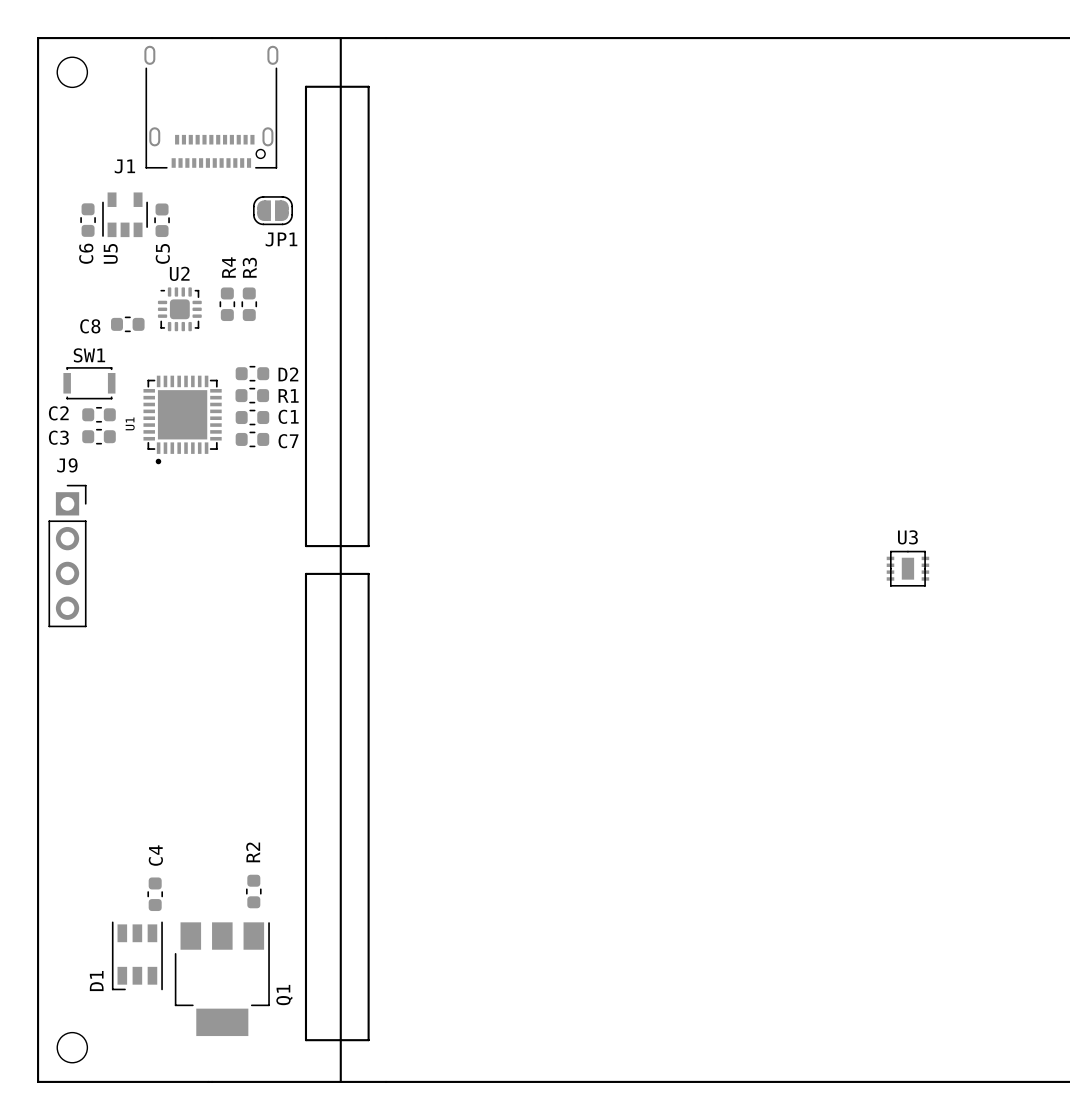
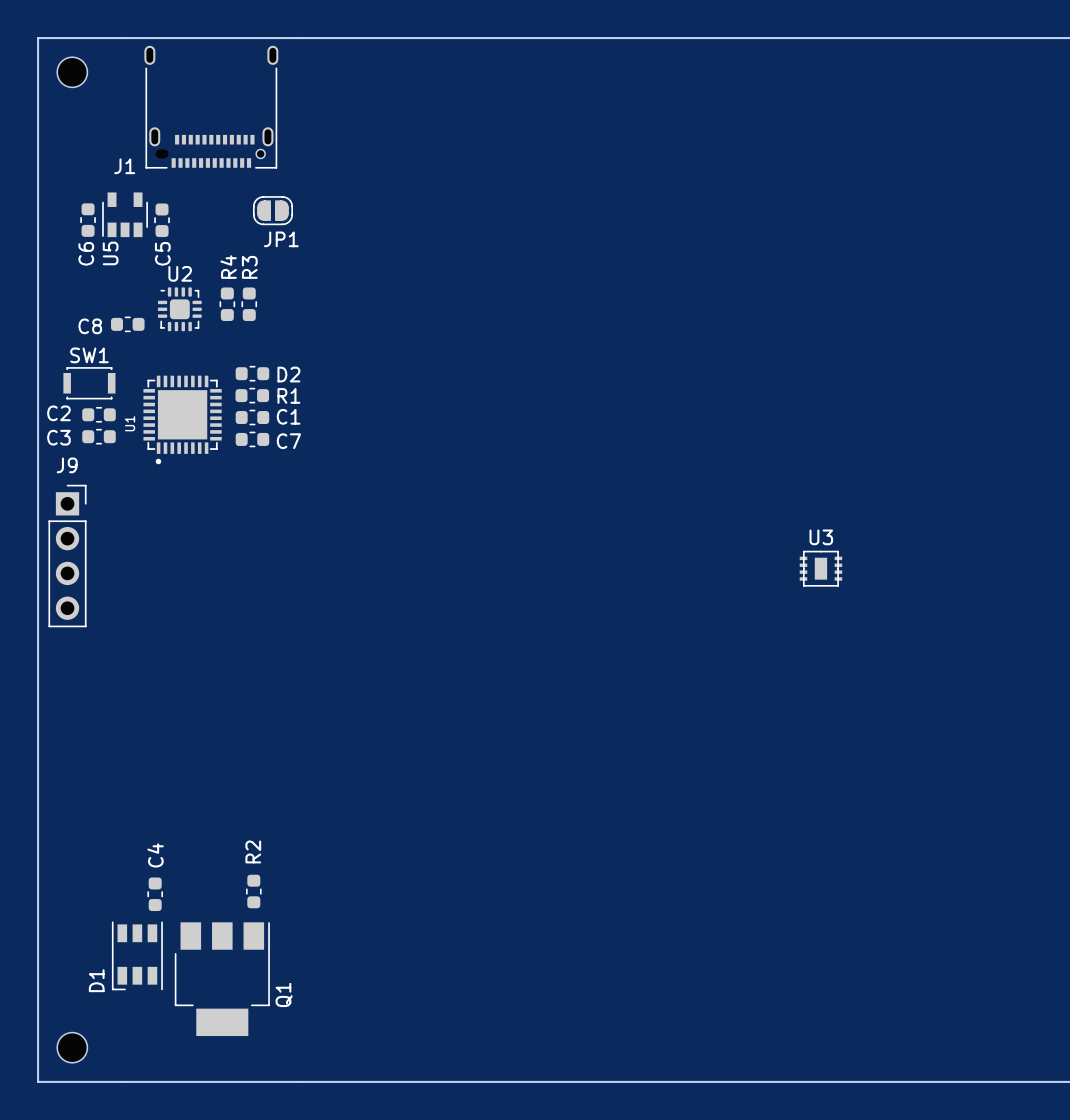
line: (340, 38) (340, 1081) -> none
board edge: (305, 86) (368, 86) (368, 546) (305, 546) (305, 86) -> none
U3 position: (907, 568) -> (820, 568)
board edge: (305, 573) (305, 1040) (368, 1040) (368, 573) (305, 573) -> none

